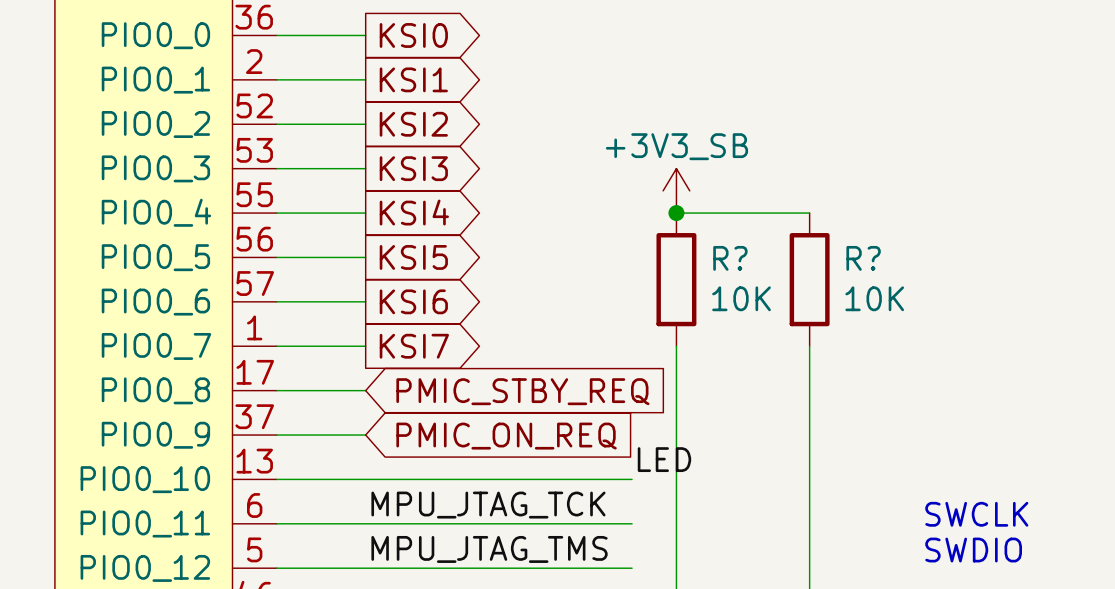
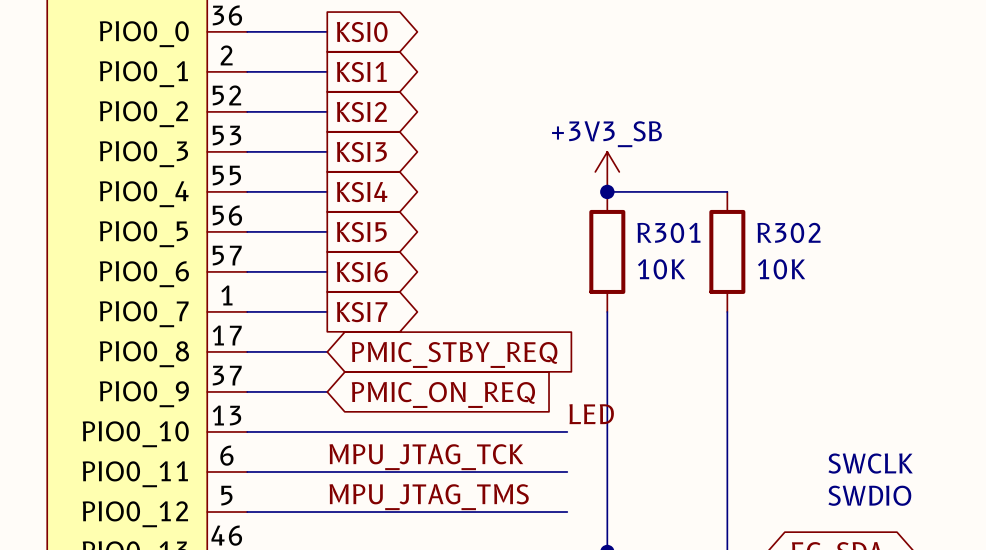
R? name: R? (730, 258) -> R301 (668, 232)
R? name: R? (863, 258) -> R302 (788, 232)

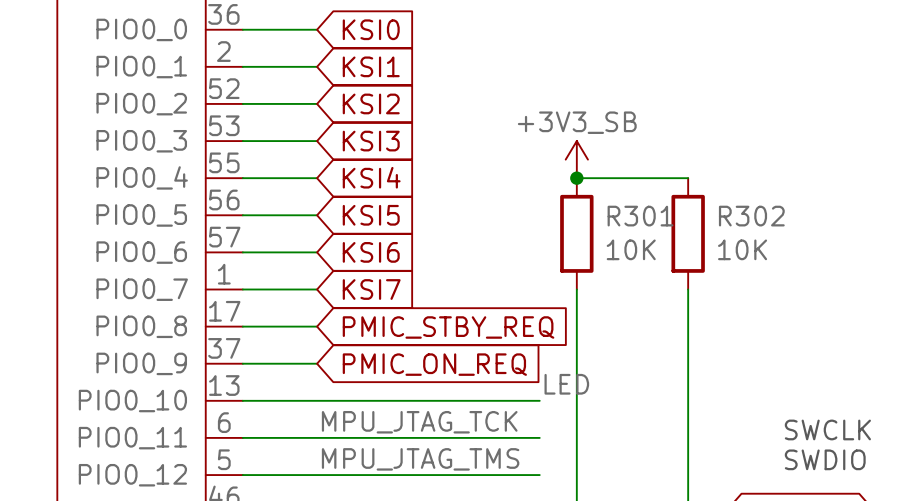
global label shape: output (362, 32) -> input (371, 29)
global label shape: output (361, 72) -> input (371, 66)
global label shape: output (361, 112) -> input (371, 103)
global label shape: output (361, 152) -> input (371, 141)
global label shape: output (362, 192) -> input (371, 177)
global label shape: output (361, 232) -> input (371, 215)
global label shape: output (362, 272) -> input (371, 252)
global label shape: output (362, 312) -> input (371, 289)

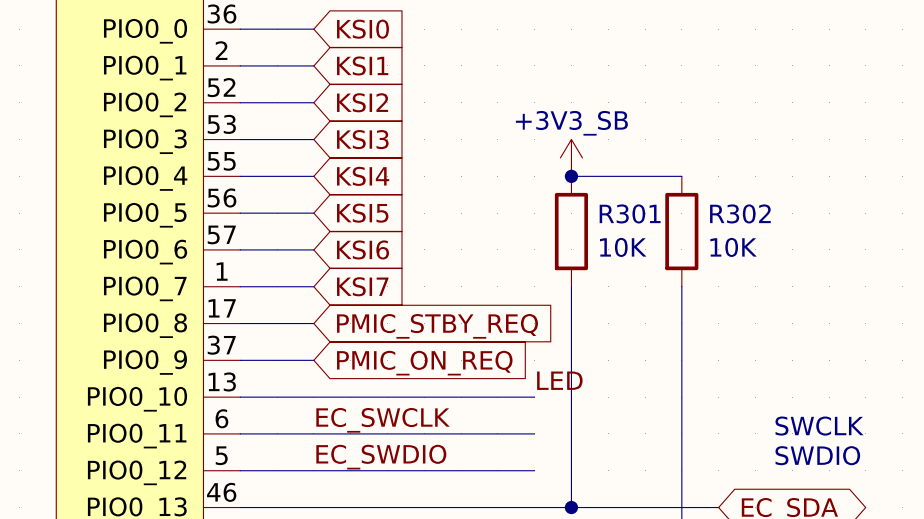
label: MPU_JTAG_TCK (419, 422) -> EC_SWCLK (383, 420)
label: MPU_JTAG_TMS (420, 459) -> EC_SWDIO (381, 457)

